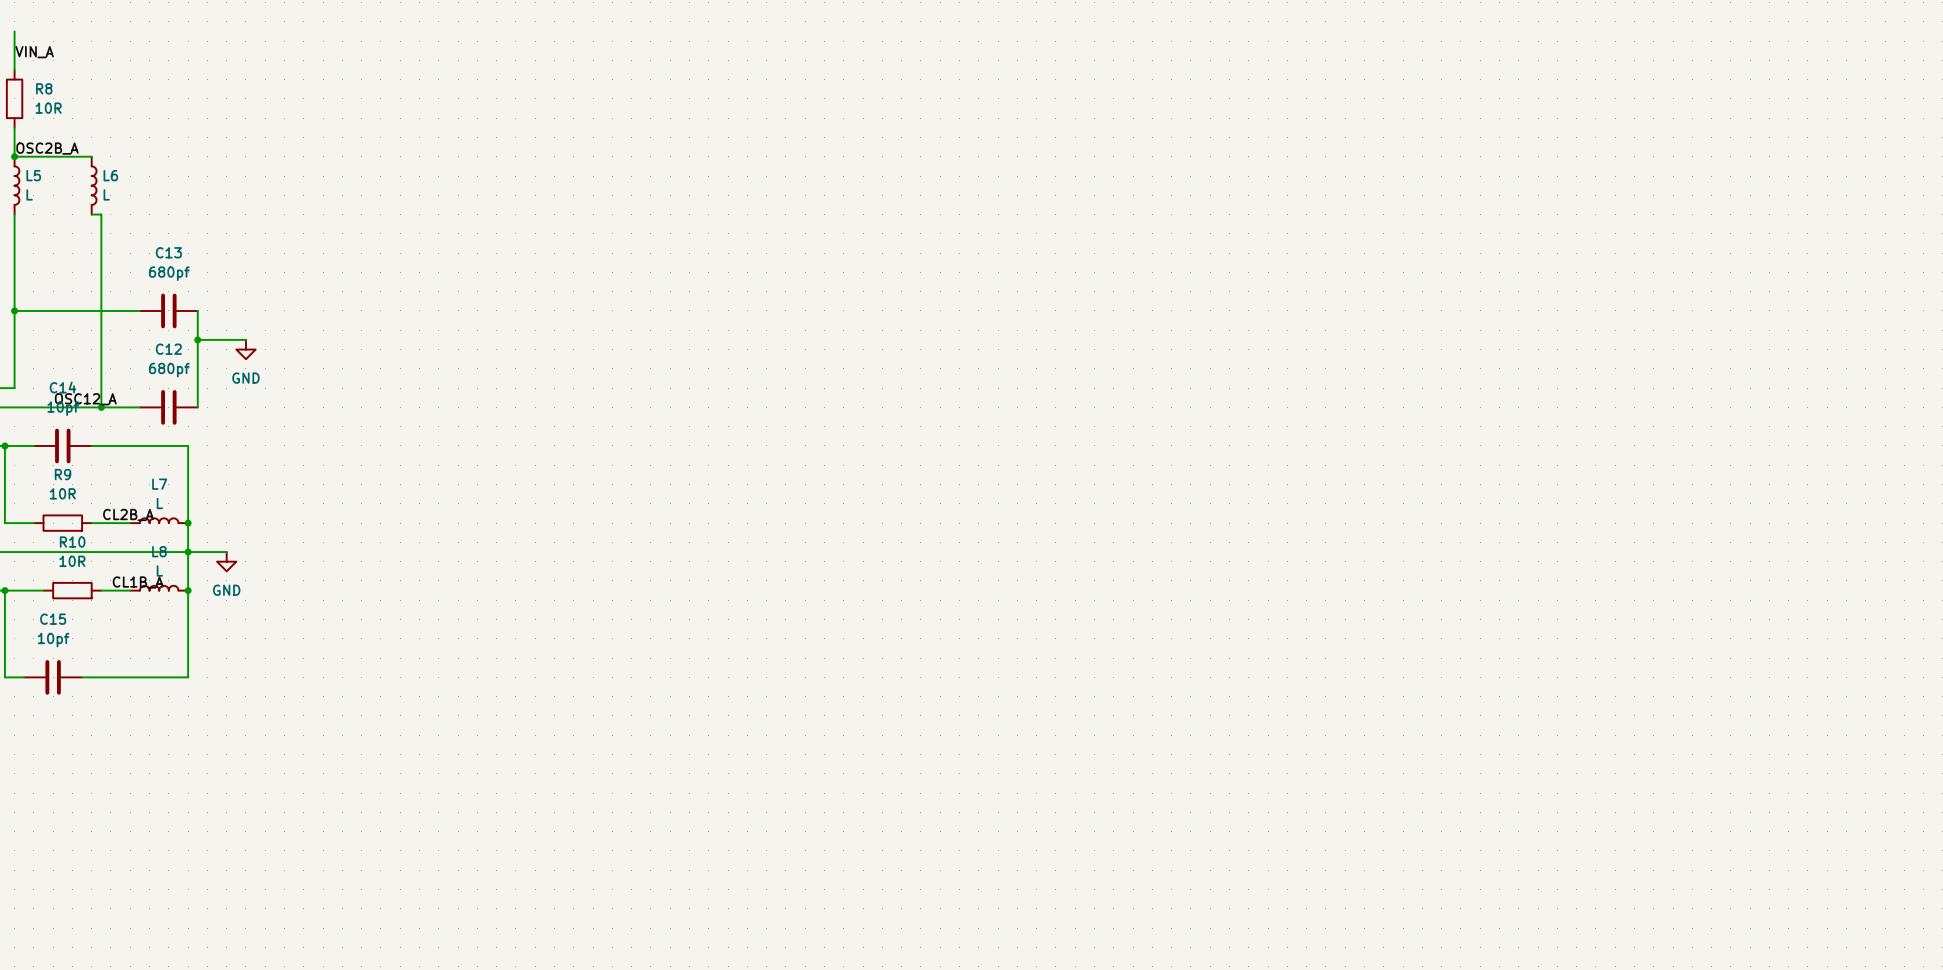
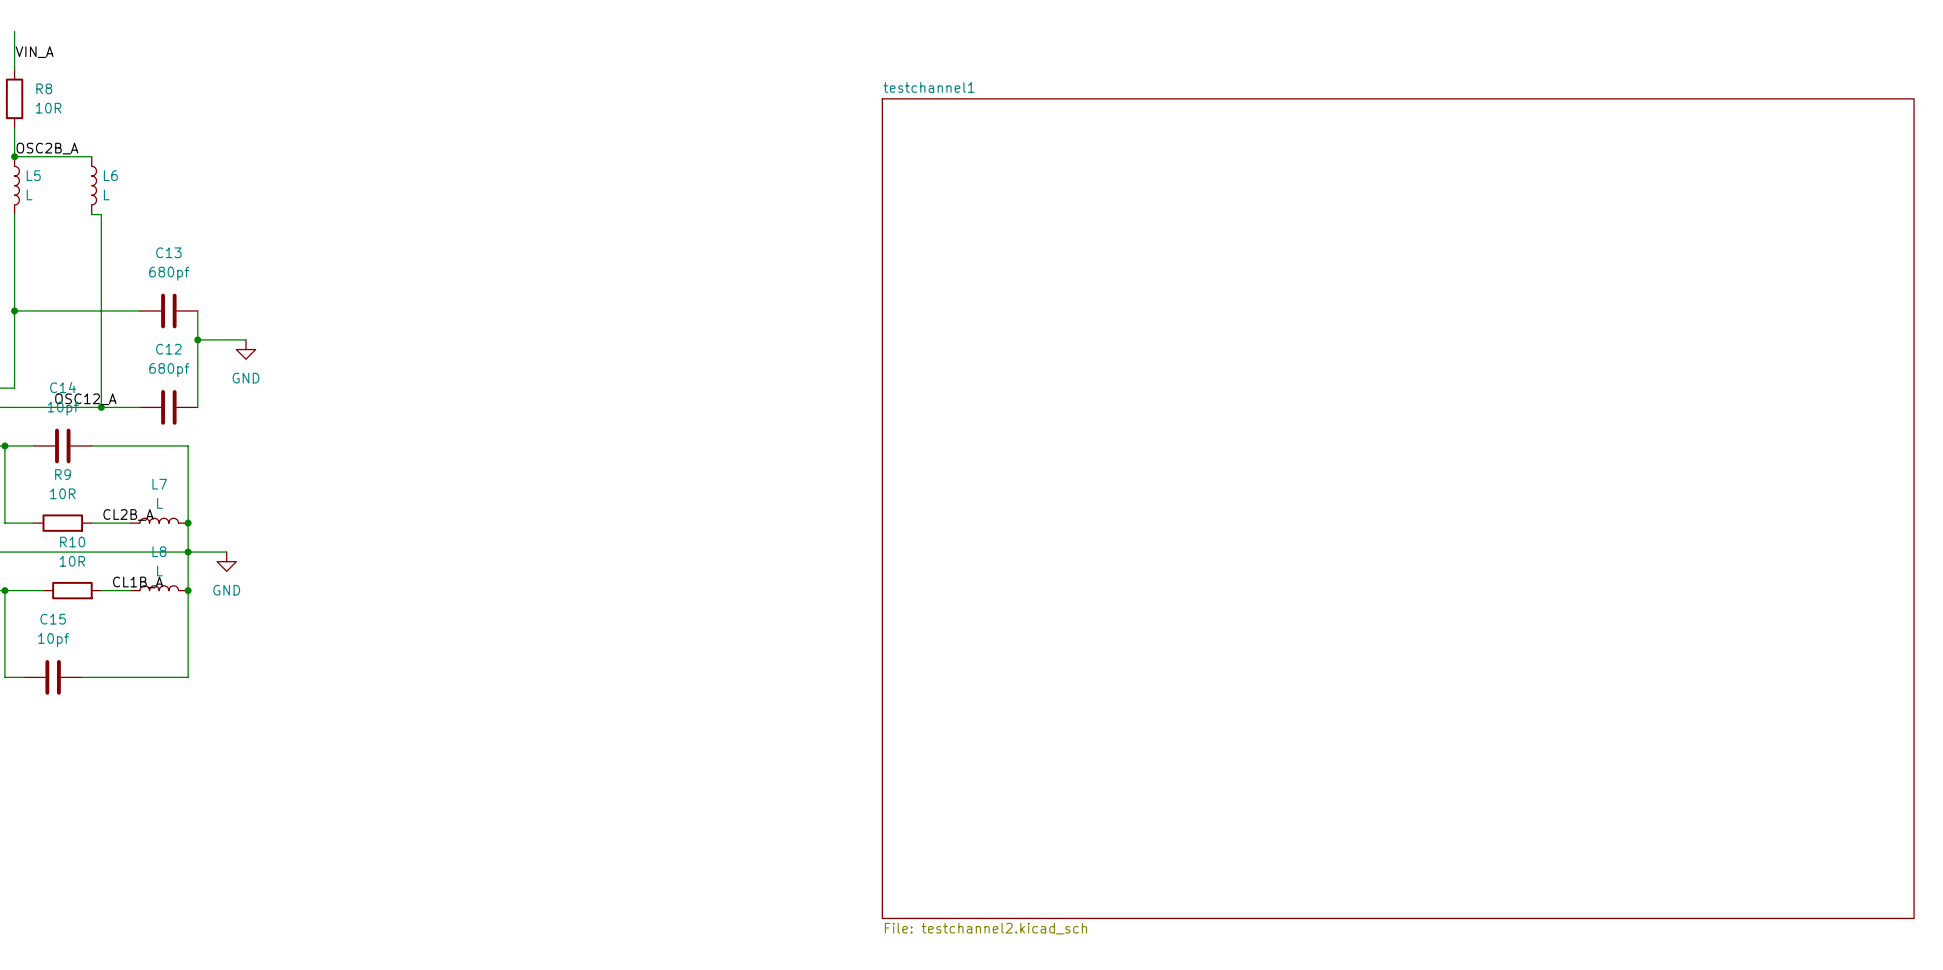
sheet testchannel1: none -> File: testchannel2.kicad_sch (1398, 508)

